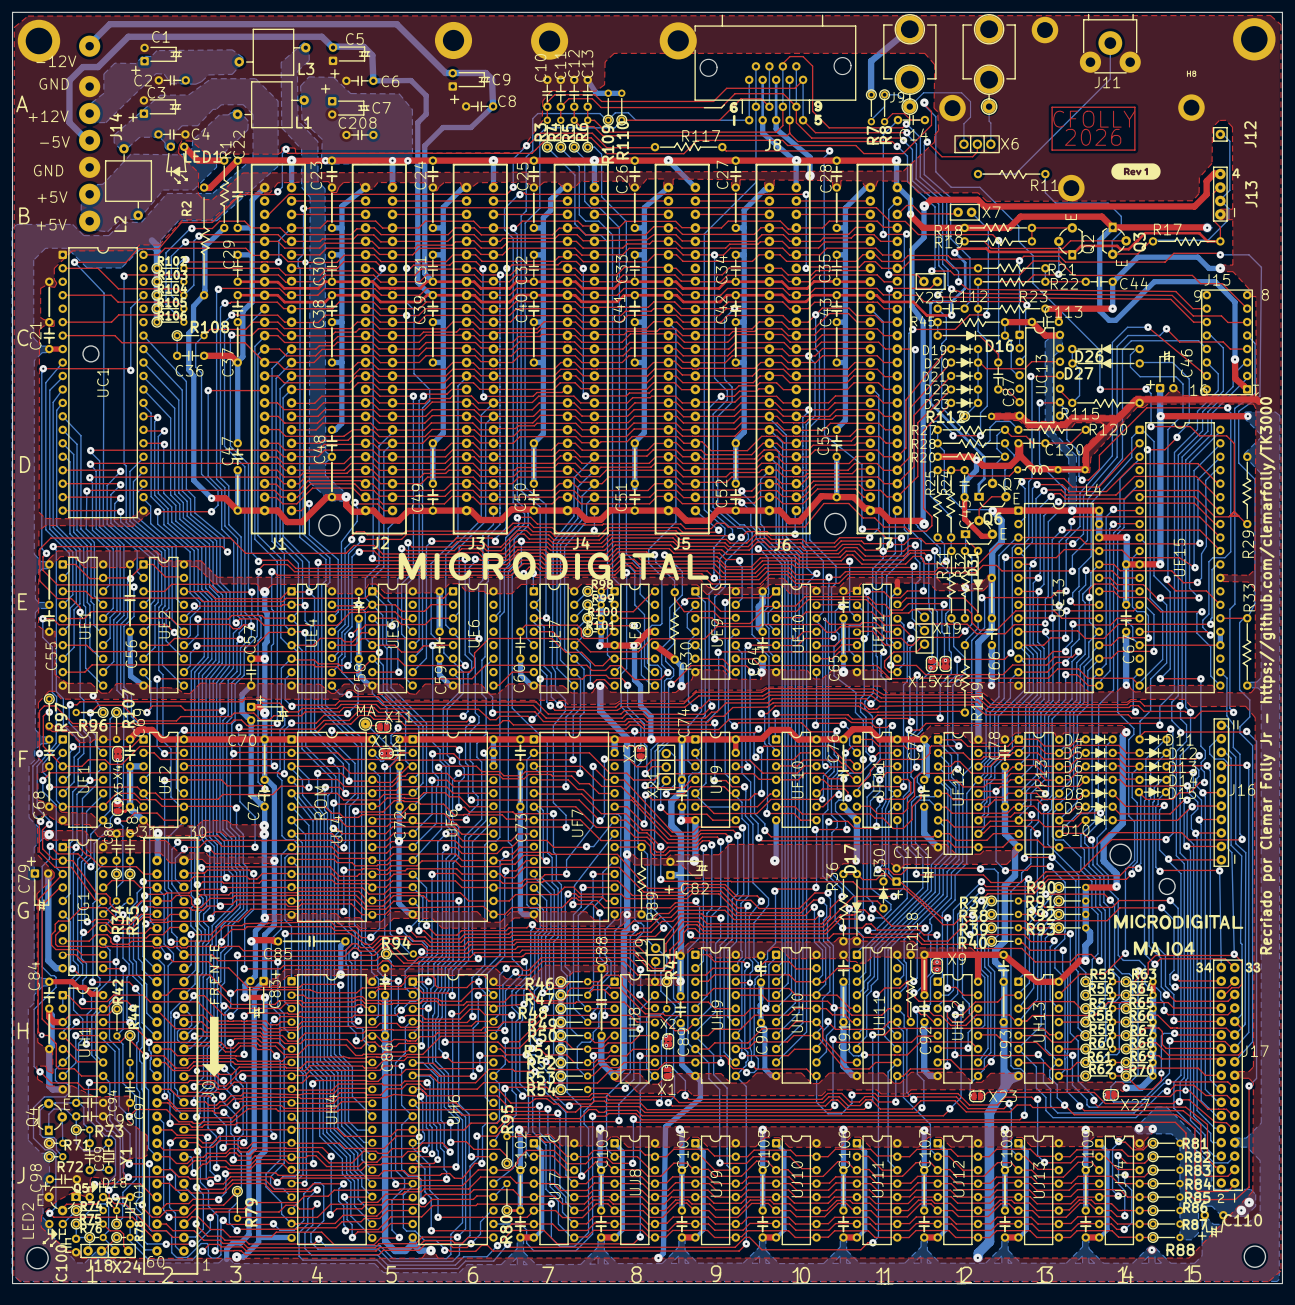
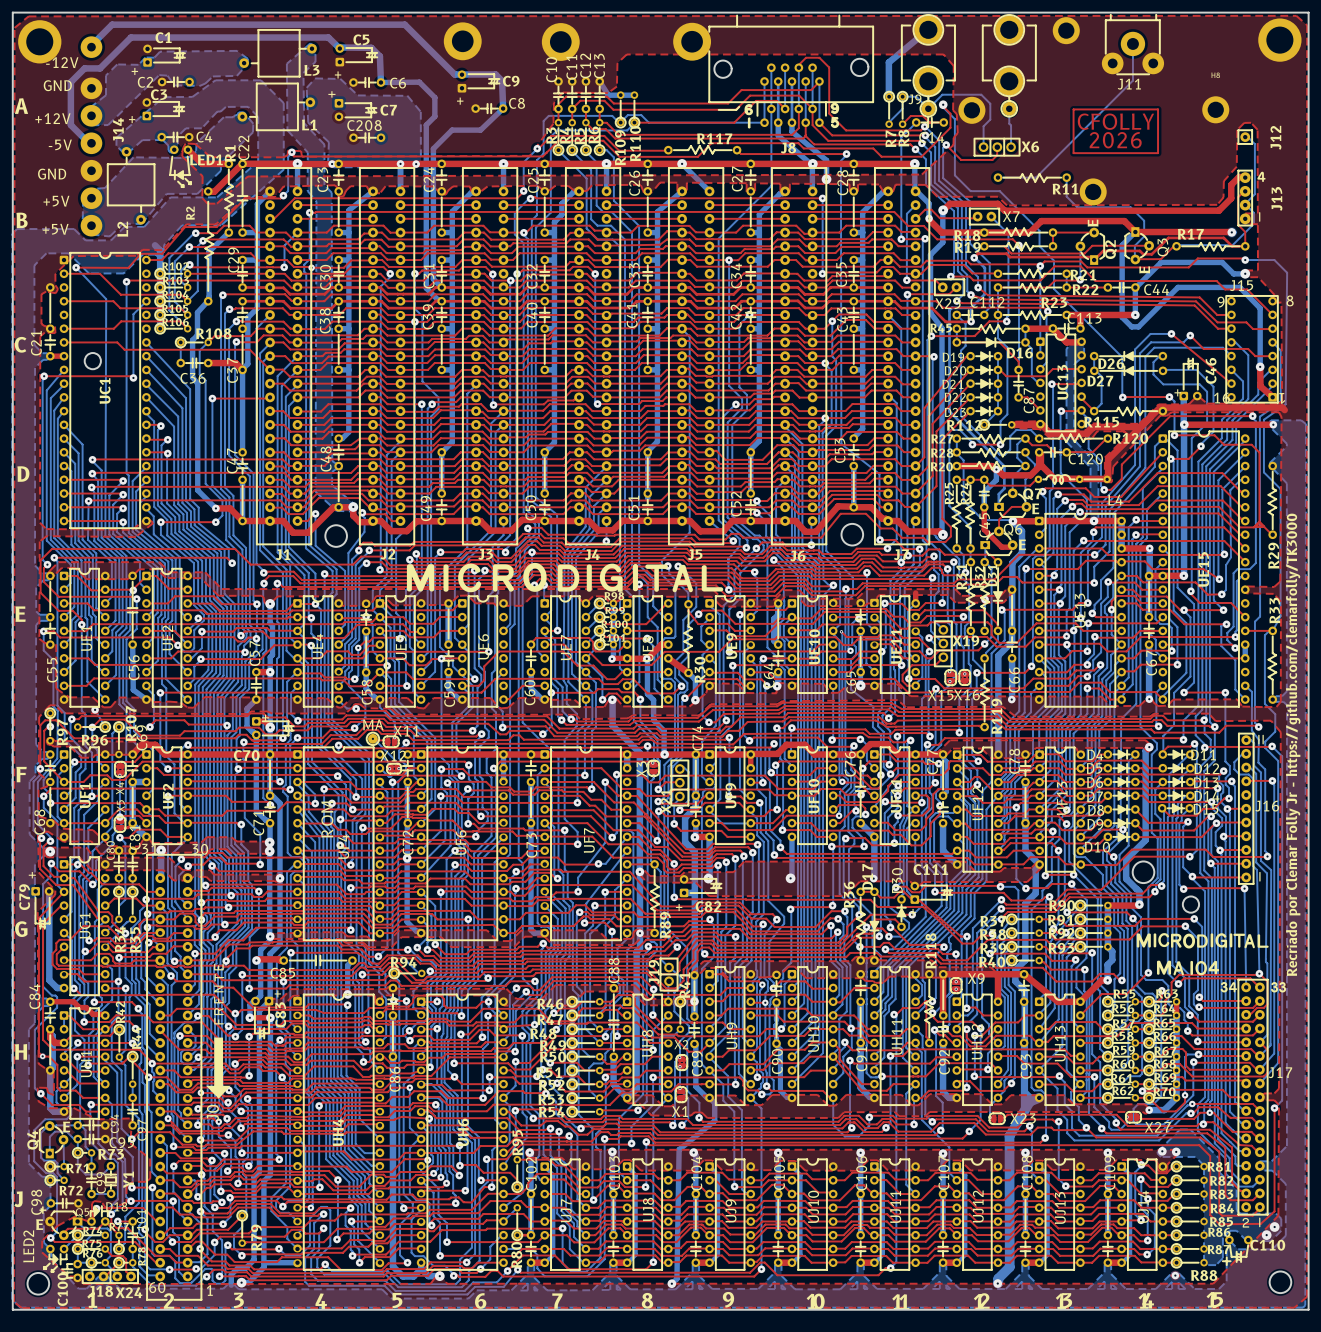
drawing: [1111, 163, 1161, 180] -> none

